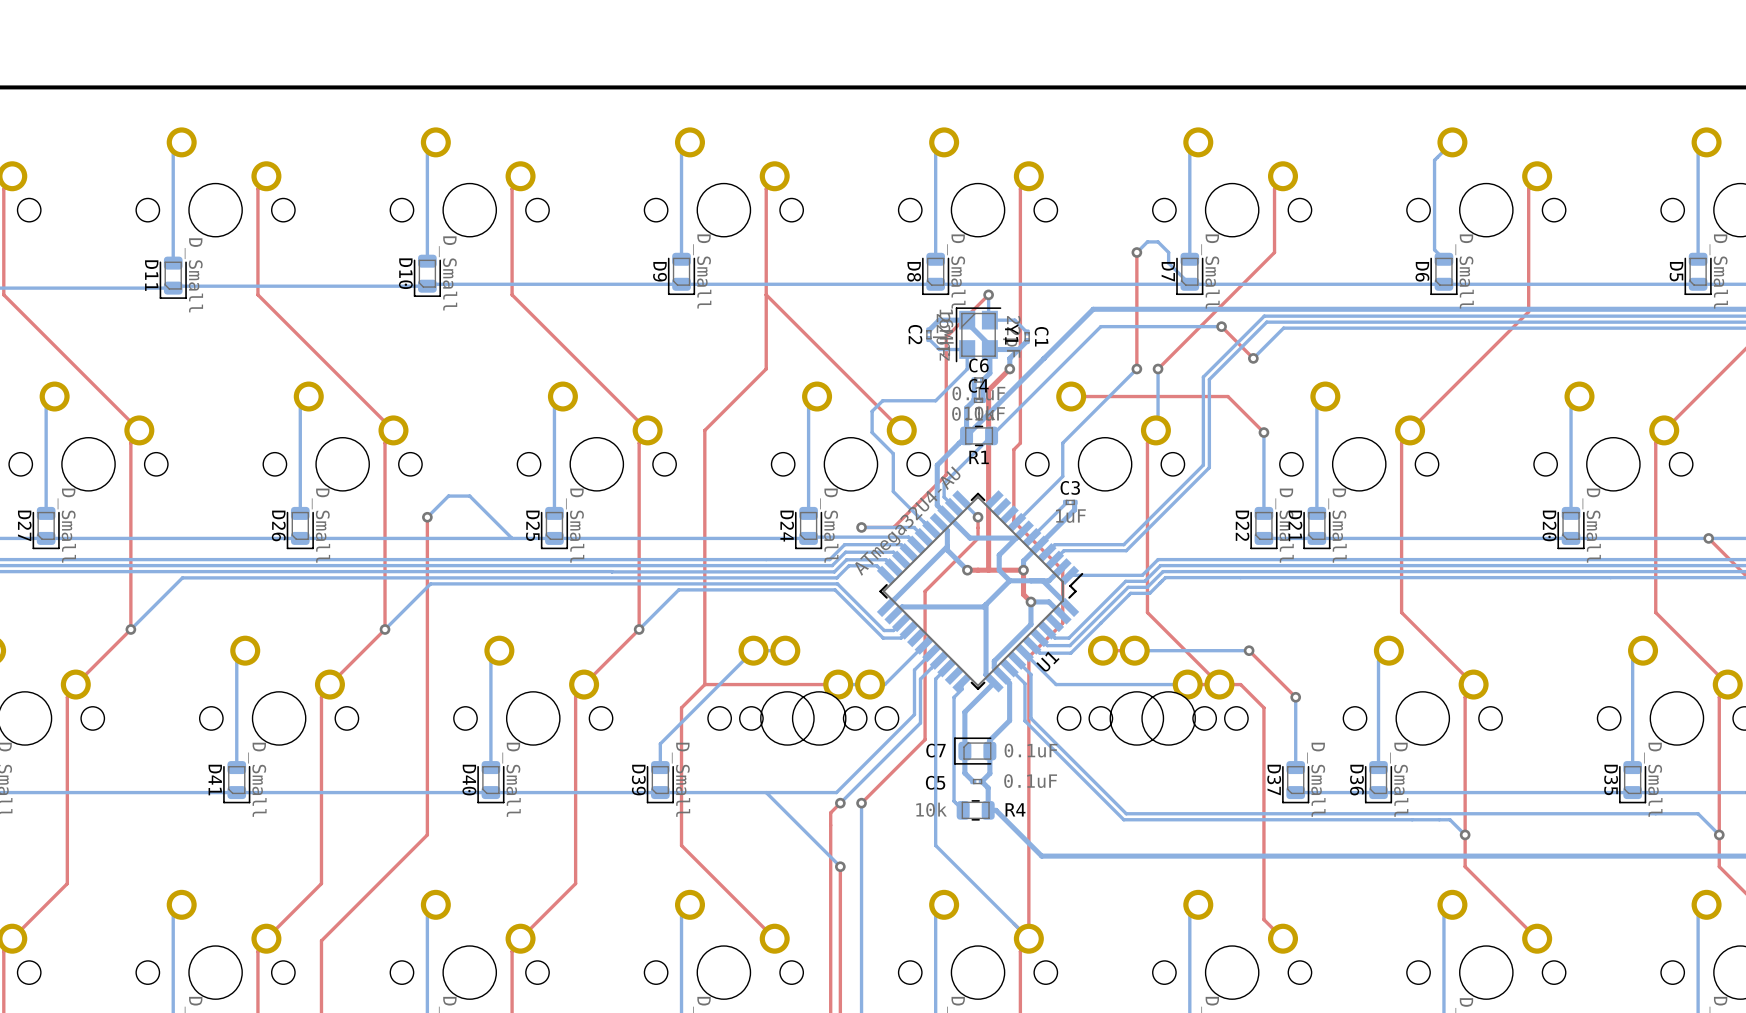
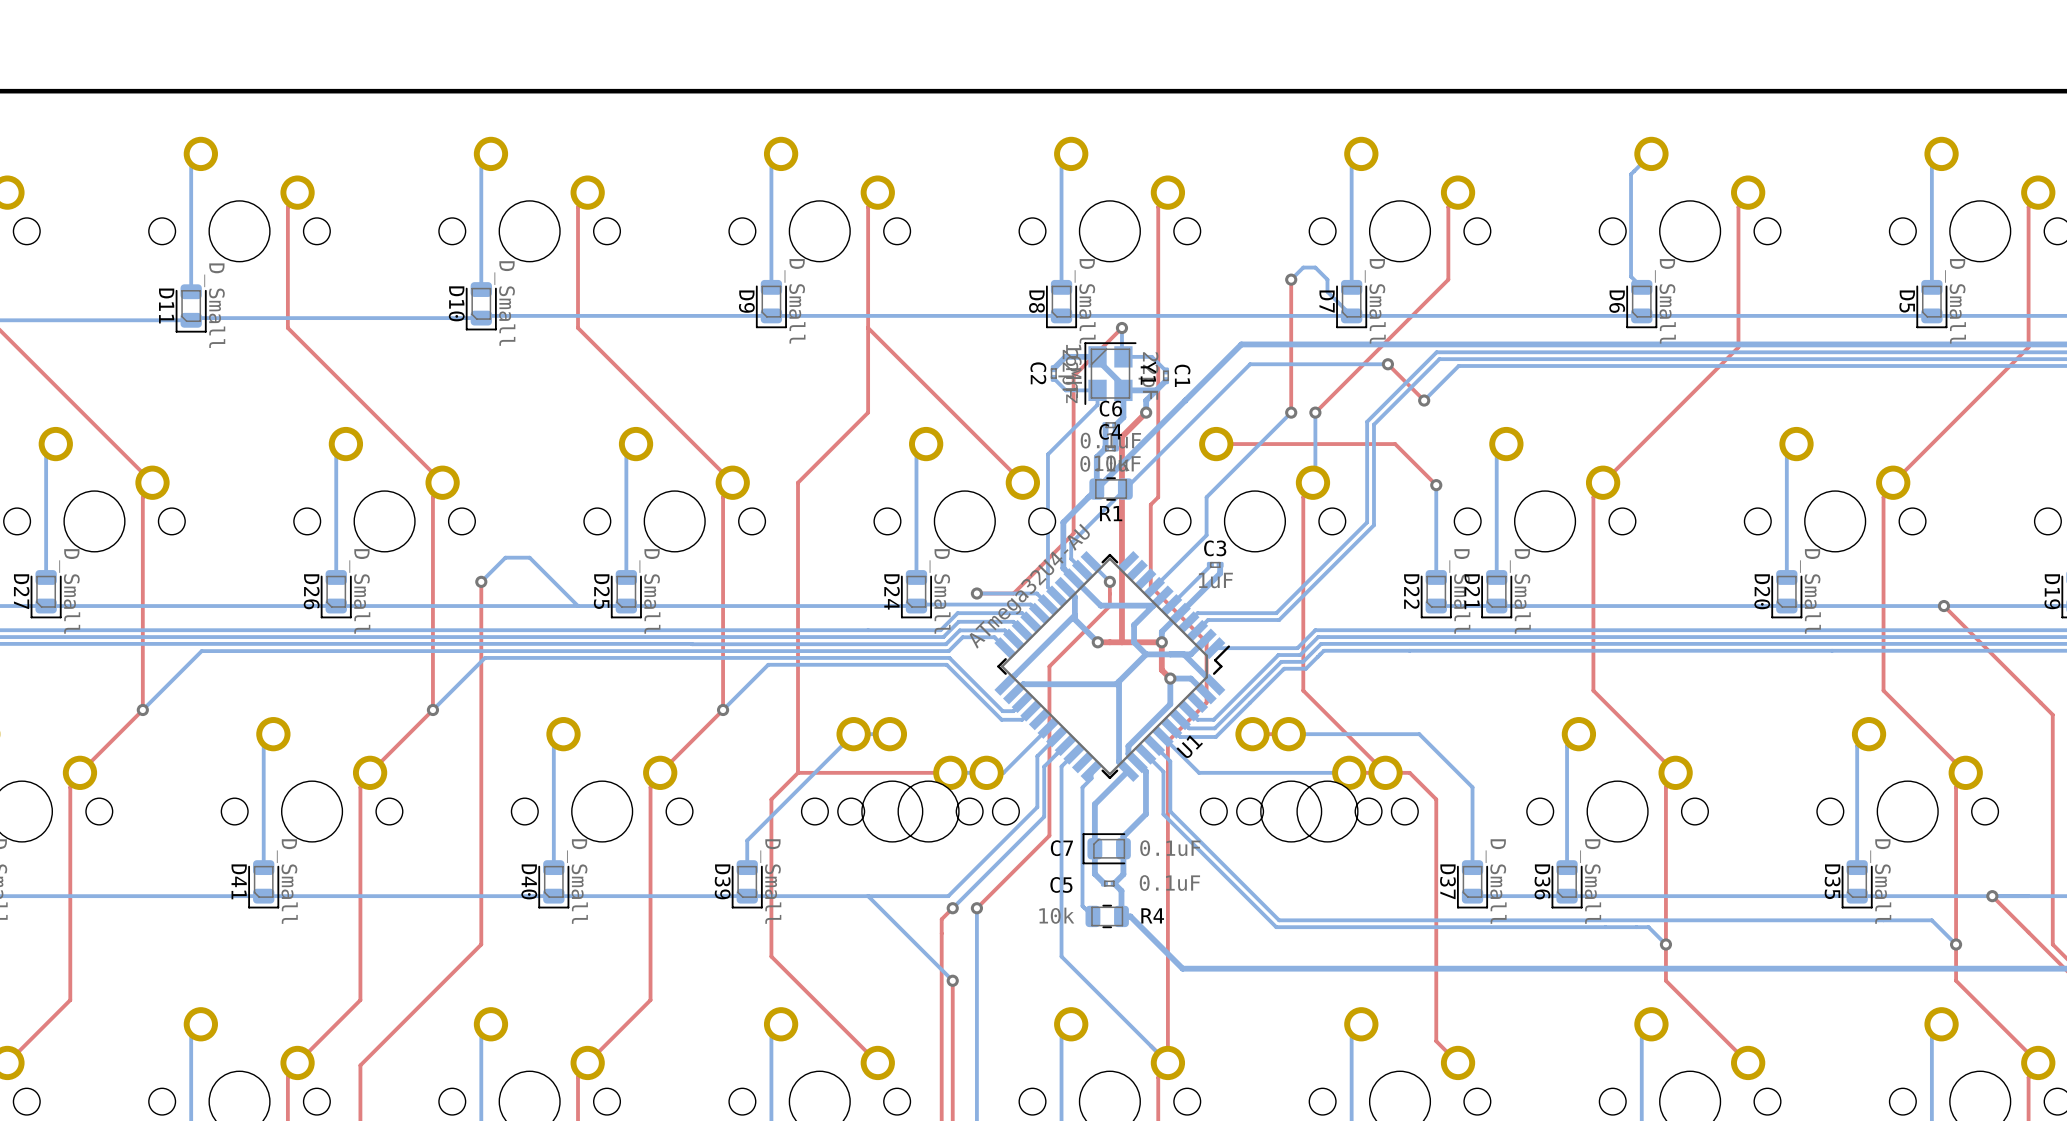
bottom track: (967, 362) (967, 369) (935, 400) (882, 400) (872, 411) (872, 432) (893, 453) (893, 491) (923, 522) -> (1097, 404) (1047, 454) (1047, 587)
bottom track: none -> (1419, 734) (1472, 787)
top track: (1249, 650) (1295, 697) -> none
via: (1249, 650) -> none
via: (1295, 697) -> none

